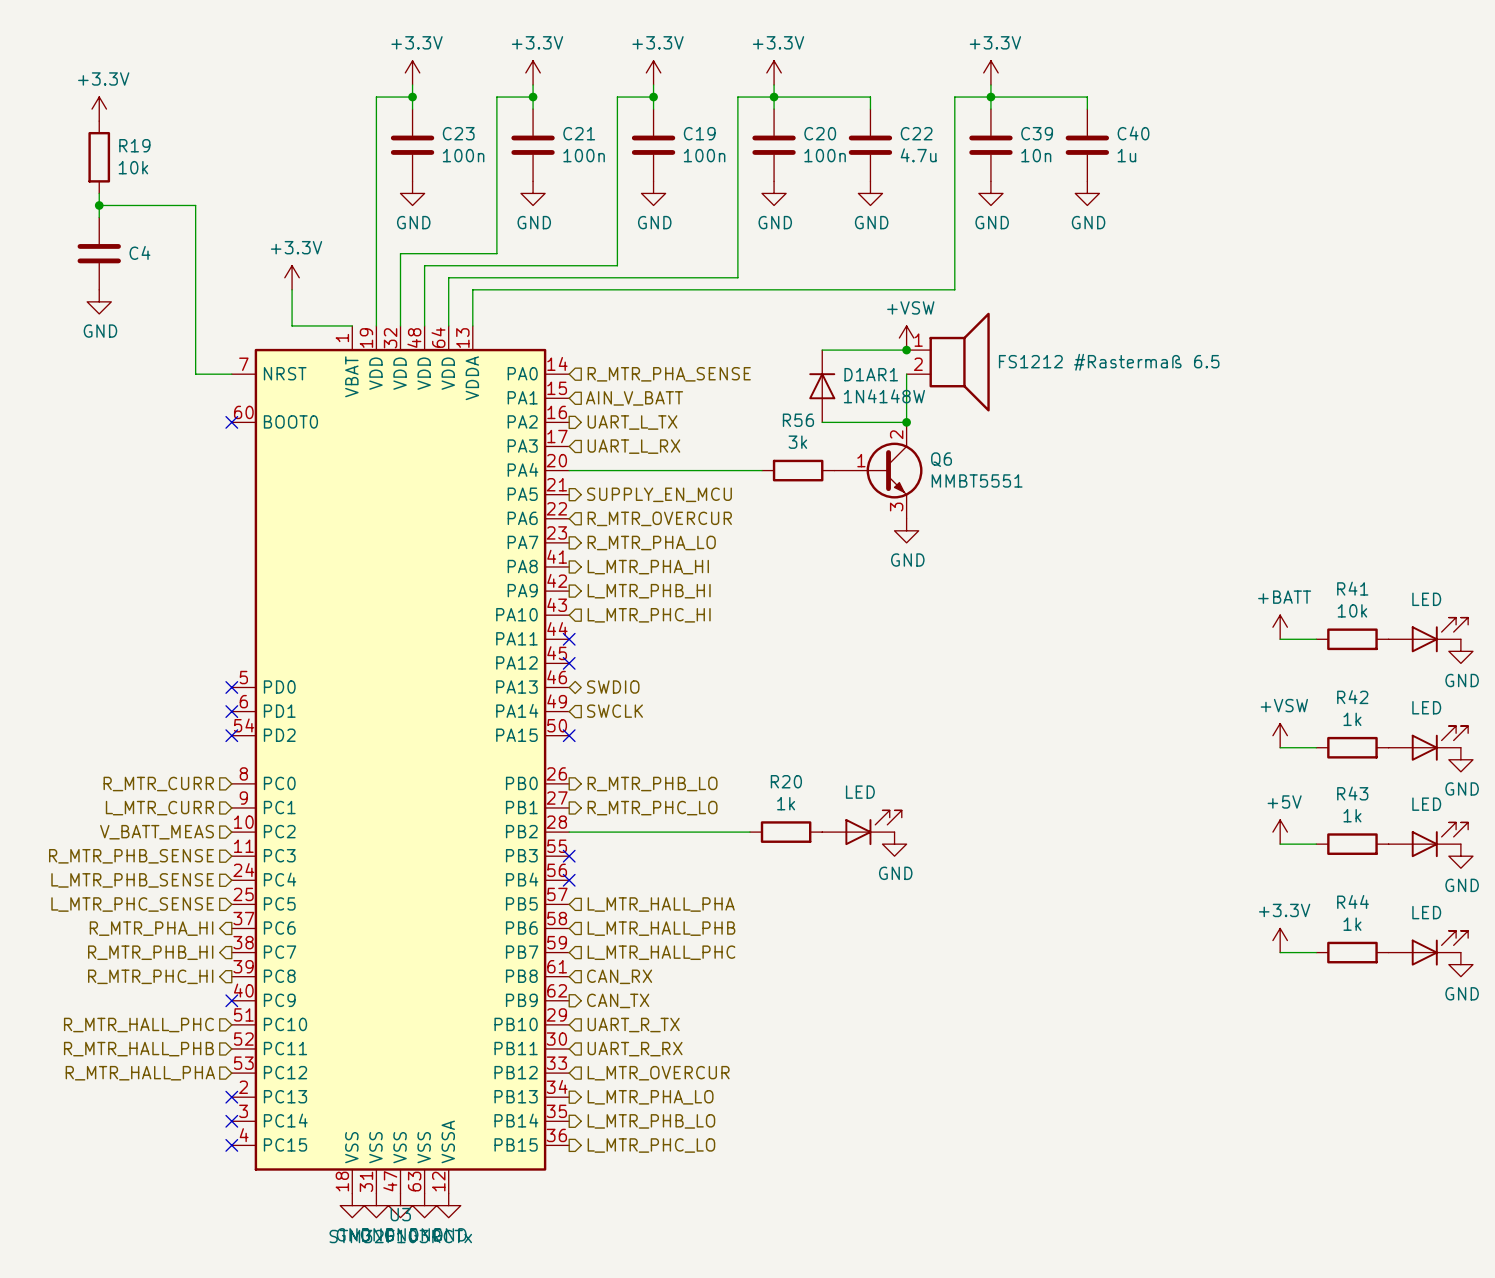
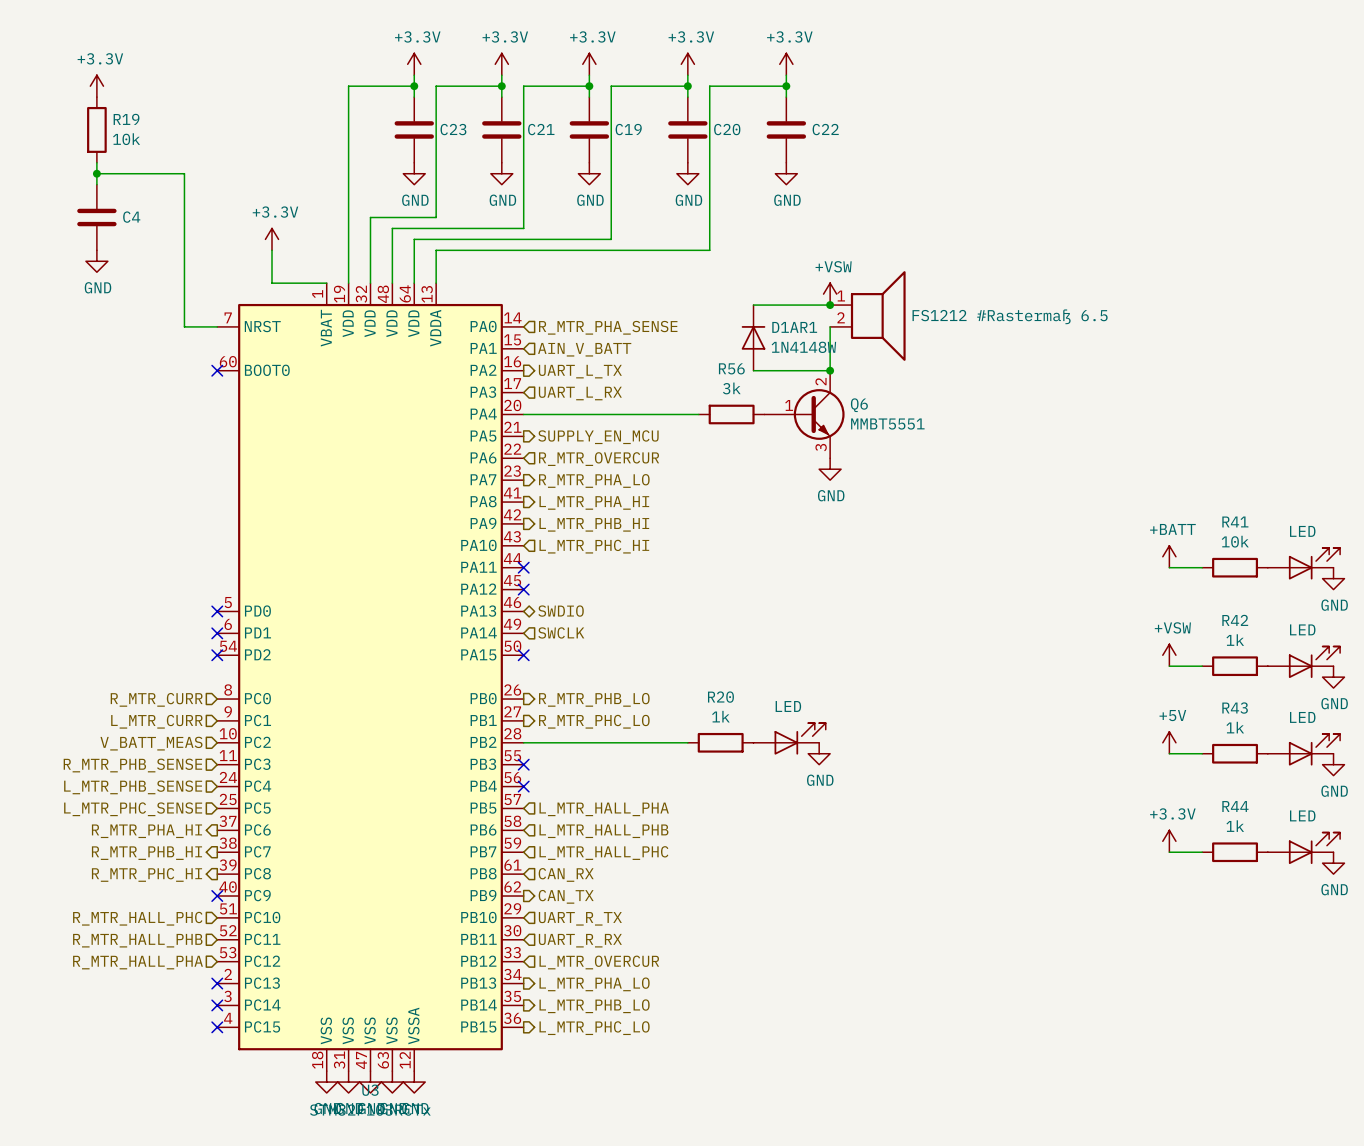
power symbol position: +3.3V (412, 72) -> +3.3V (414, 64)
power symbol position: +3.3V (533, 72) -> +3.3V (501, 64)
power symbol position: +3.3V (653, 72) -> +3.3V (589, 64)
power symbol position: +3.3V (774, 72) -> +3.3V (687, 64)
power symbol: +3.3V (990, 72) -> none
wire: (412, 84) (412, 109) -> (414, 75) (414, 97)
wire: (533, 84) (533, 109) -> (501, 75) (501, 97)
wire: (653, 84) (653, 109) -> (687, 75) (687, 97)
wire: (774, 84) (774, 109) -> (589, 75) (589, 97)
power symbol: none -> +3.3V (786, 64)
wire: (990, 84) (990, 109) -> (786, 75) (786, 97)
wire: (412, 97) (376, 97) (376, 109) -> (414, 86) (348, 86)
junction position: (412, 97) -> (414, 86)
wire: (533, 97) (496, 97) (496, 253) (472, 253) -> (501, 86) (436, 86) (436, 217)
junction position: (533, 97) -> (501, 86)
wire: (653, 97) (617, 97) (617, 265) (569, 265) -> (589, 86) (523, 86) (523, 228)
junction position: (653, 97) -> (589, 86)
junction position: (774, 97) -> (687, 86)
junction: (990, 97) -> none
junction: none -> (786, 86)
wire: (870, 109) (870, 97) (737, 97) (737, 277) (665, 277) -> (687, 86) (611, 86) (611, 239)
wire: (1087, 109) (1087, 97) (954, 97) (954, 289) (774, 289) -> (786, 86) (709, 86) (709, 250)
C23 name position: C23 (458, 133) -> C23 (453, 129)
C21 name position: C21 (579, 133) -> C21 (541, 129)
C19 name position: C19 (699, 133) -> C19 (628, 129)
C20 name position: C20 (820, 133) -> C20 (727, 129)
C22 name position: C22 (916, 133) -> C22 (825, 129)
C23 position: (412, 145) -> (414, 129)
C21 position: (533, 145) -> (501, 129)
C19 position: (653, 145) -> (589, 129)
C20 position: (774, 145) -> (687, 129)
C22 position: (870, 145) -> (786, 129)
C39: 10n (990, 145) -> none
C40: 1u (1087, 145) -> none
C23 value: 100n (463, 155) -> none
C21 value: 100n (584, 155) -> none
C19 value: 100n (704, 155) -> none
C20 value: 100n (825, 155) -> none
C22 value: 4.7u (918, 155) -> none
power symbol position: GND (412, 193) -> GND (414, 173)
power symbol position: GND (533, 193) -> GND (501, 173)
power symbol position: GND (653, 193) -> GND (589, 173)
power symbol position: GND (774, 193) -> GND (687, 173)
power symbol position: GND (870, 193) -> GND (786, 173)
power symbol: GND (990, 193) -> none
power symbol: GND (1087, 193) -> none

